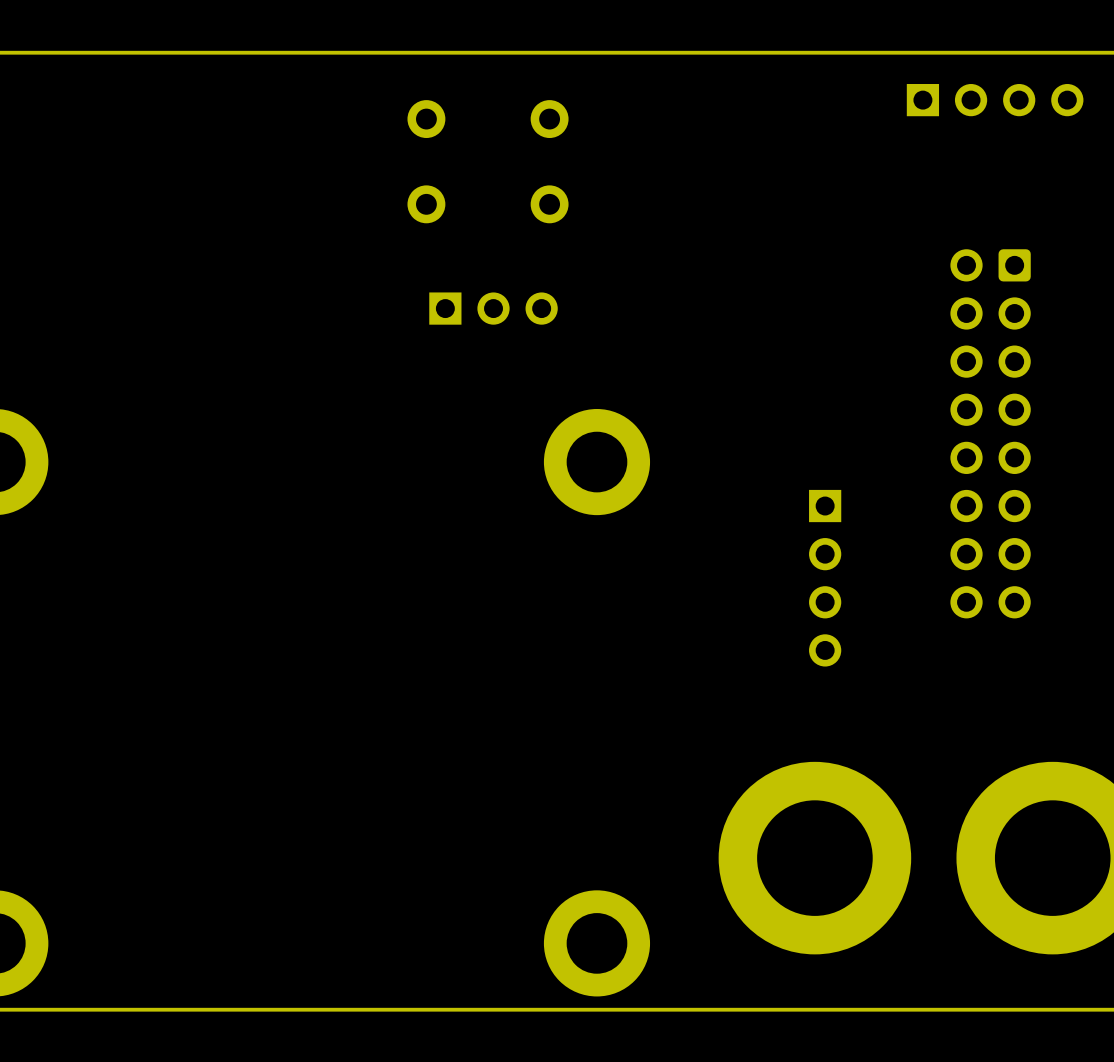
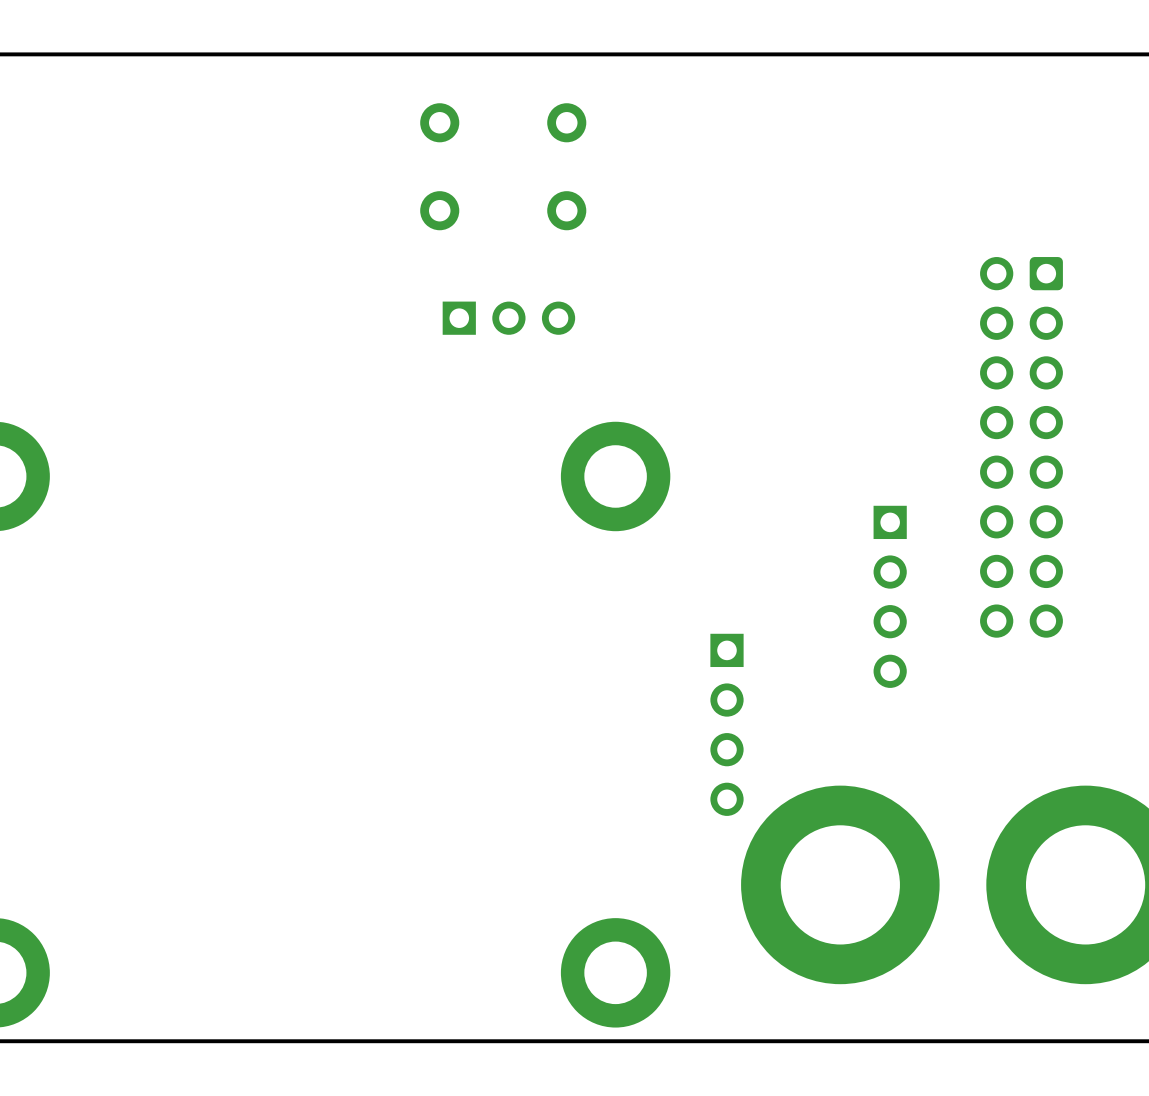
part: (995, 100) -> none
part position: (825, 578) -> (890, 596)
part: none -> (726, 724)

